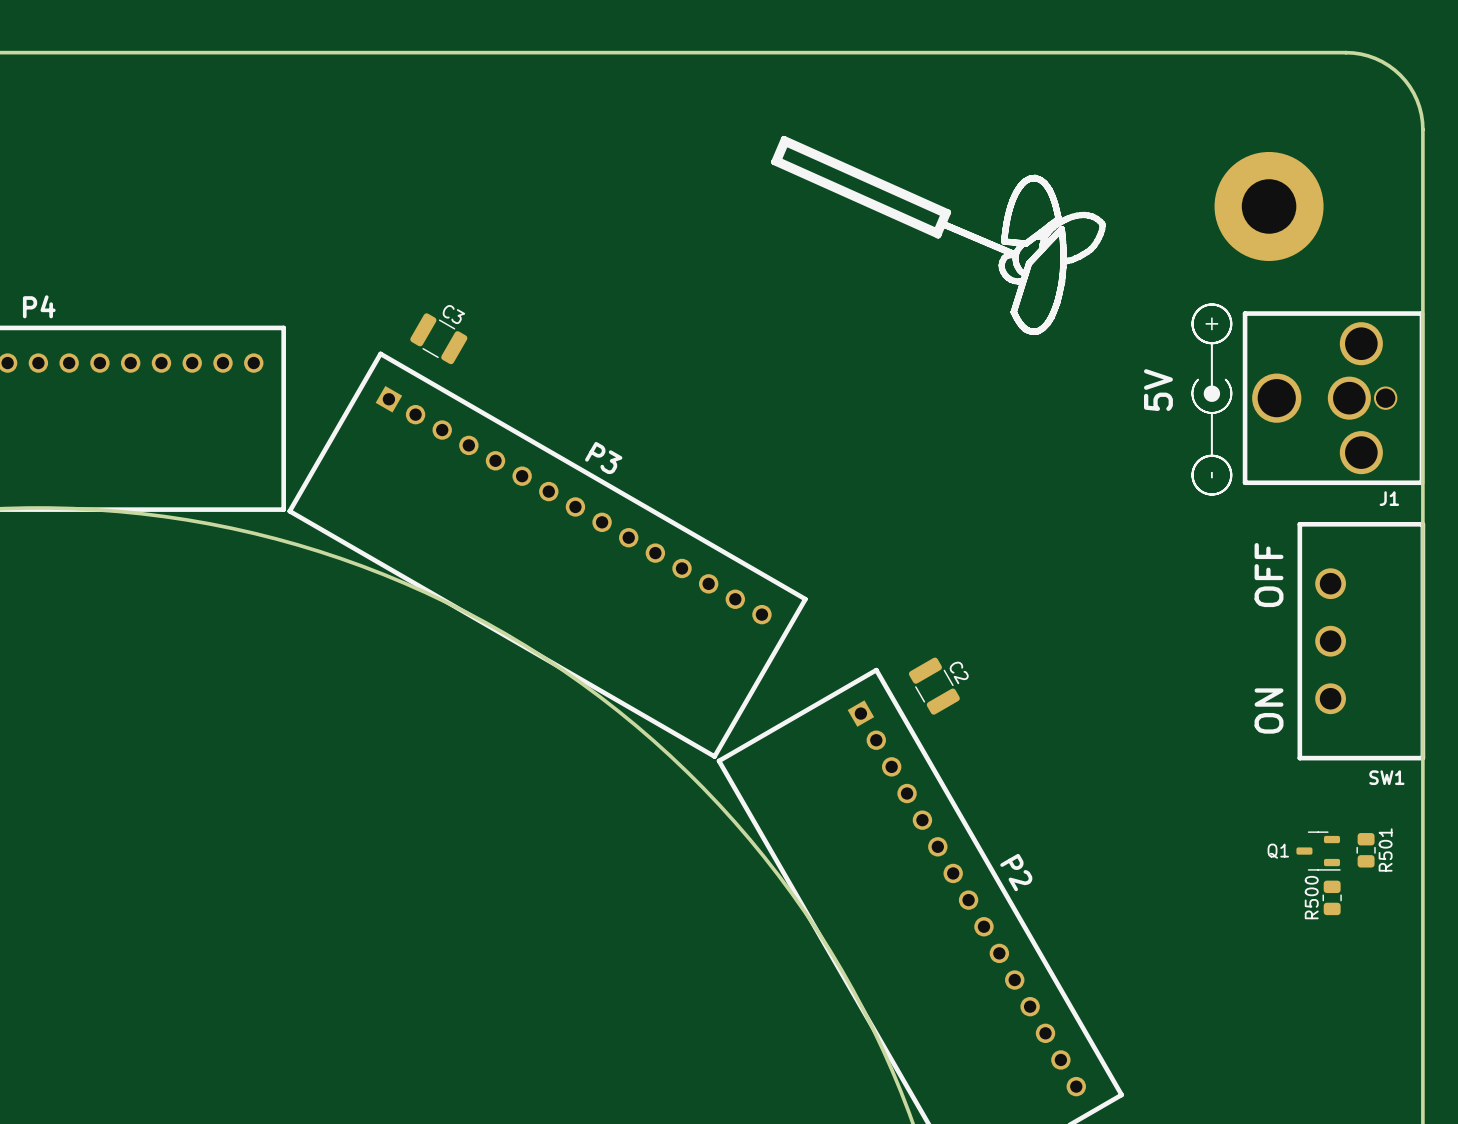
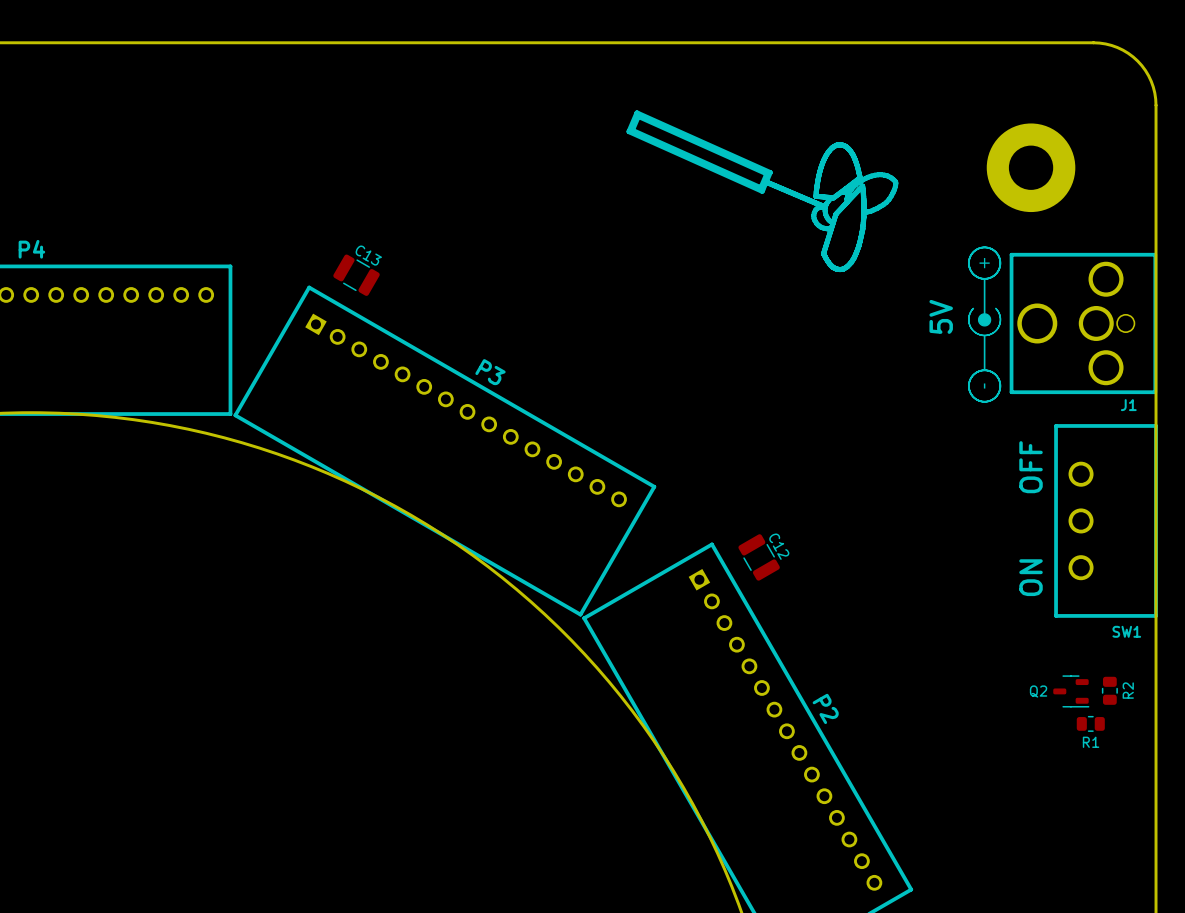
C3 name: C3 (453, 314) -> C13 (368, 255)
C2 name: C2 (959, 672) -> C12 (779, 546)
R501 name: R501 (1385, 849) -> R2 (1128, 690)
Q1 name: Q1 (1278, 851) -> Q2 (1038, 691)
R1: none -> (1090, 723)
R500: (1332, 897) -> none

